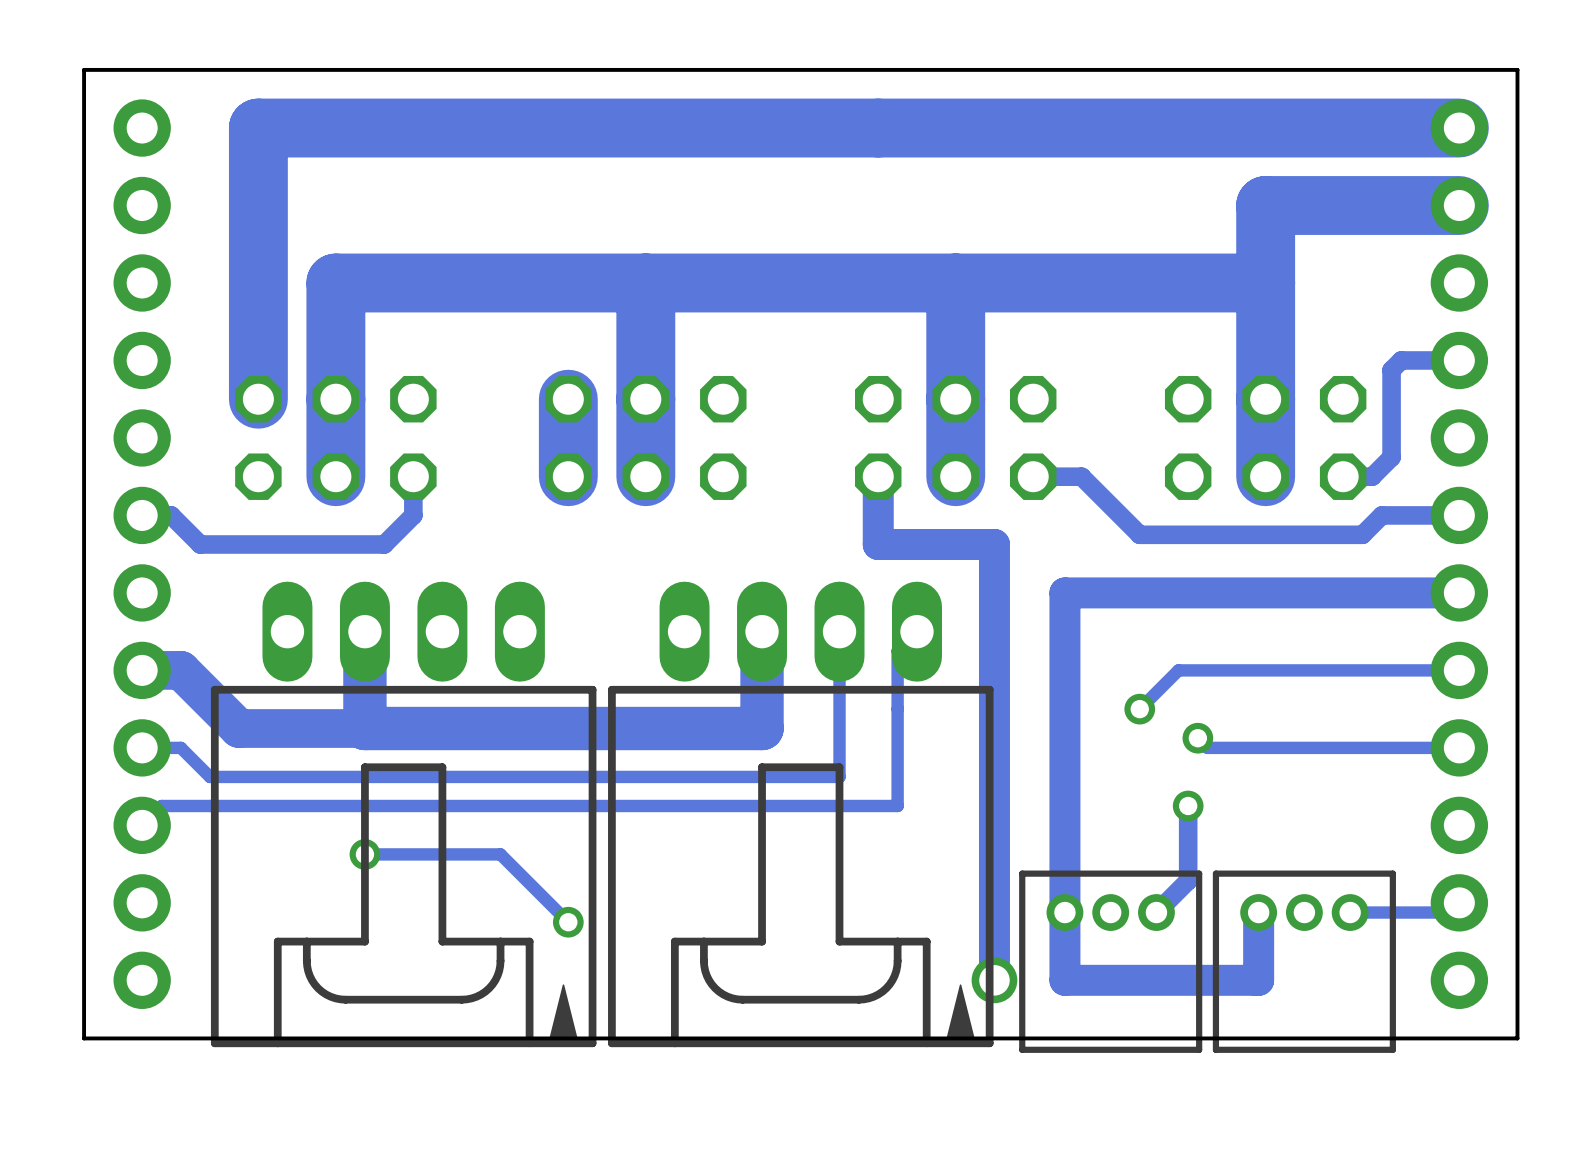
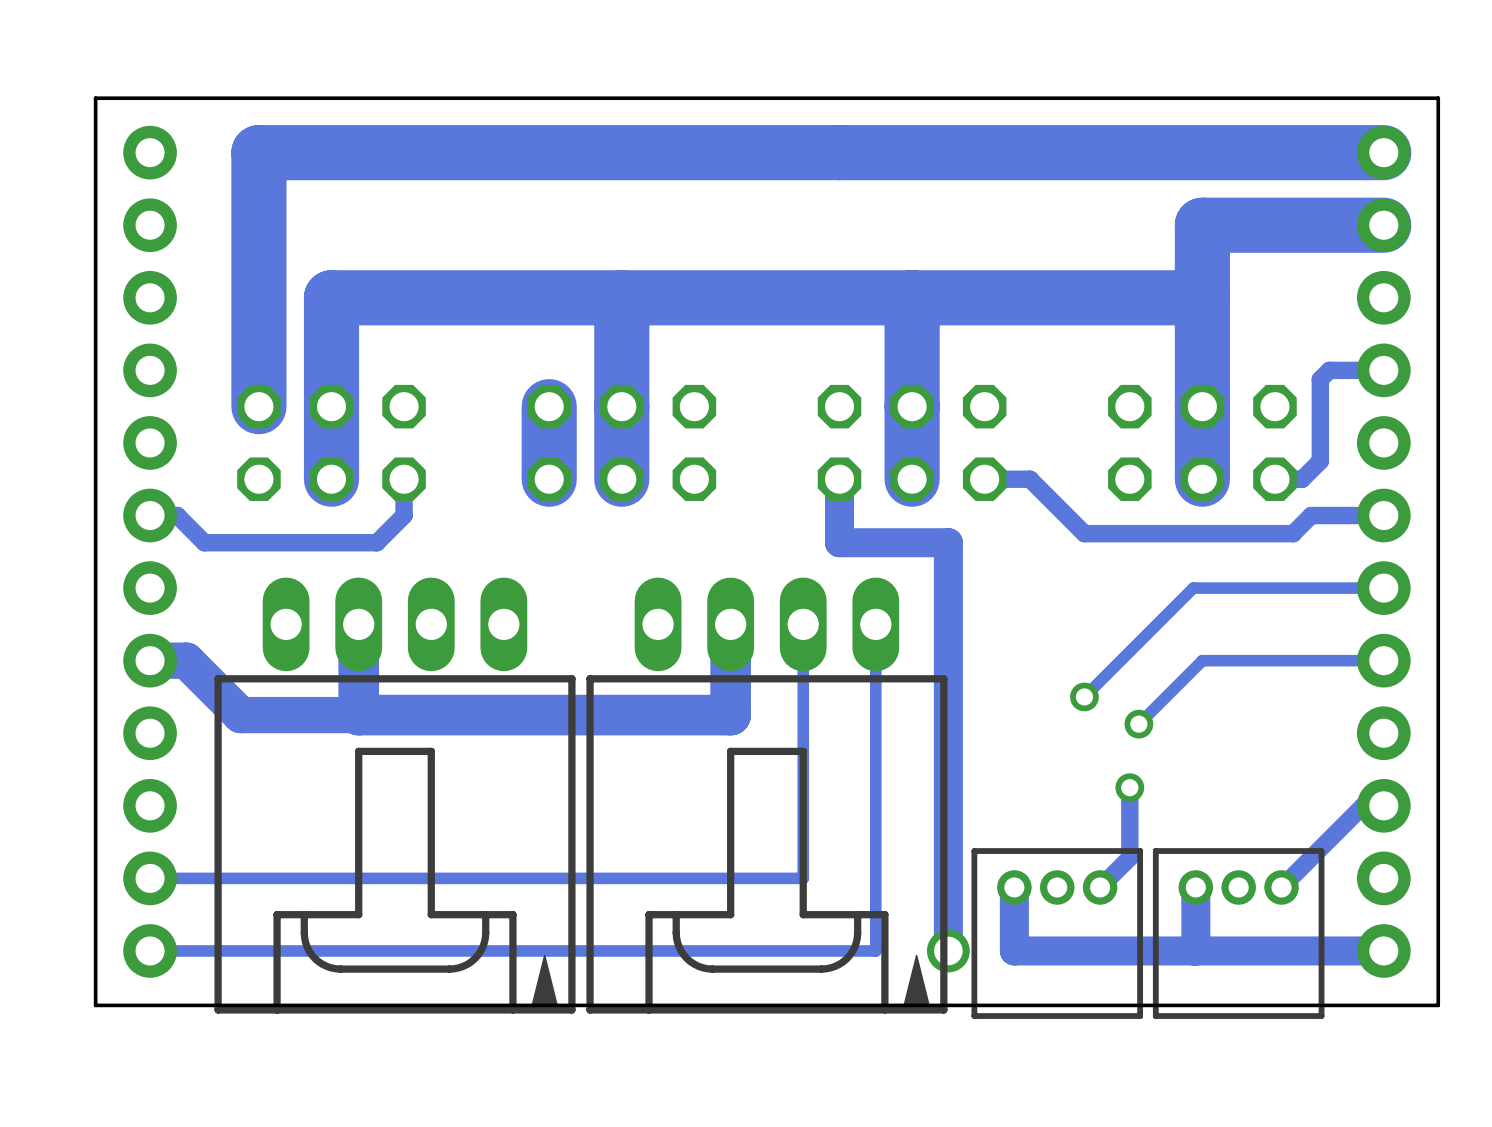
track: (1255, 592) (1064, 592) (1064, 912) -> (1193, 588) (1120, 660)
track width: thick (1459, 592) (1255, 592) -> thin (1383, 588) (1193, 588)
track: (916, 631) (897, 651) (897, 805) (161, 805) (142, 825) -> (875, 624) (875, 950) (150, 950)
track: (1265, 670) (1178, 670) -> (1202, 660) (1138, 724)
track: (1197, 738) (1207, 747) (1459, 747) -> none
track: (142, 747) (180, 747) (209, 776) (839, 776) -> (150, 878) (803, 878) (803, 760)
track: (364, 854) (500, 854) (568, 922) -> none
via: (364, 854) -> none
track: (1459, 902) (1449, 912) (1350, 912) -> (1383, 805) (1363, 805) (1281, 887)
via: (568, 922) -> none
track: none -> (1383, 950) (1195, 950)

